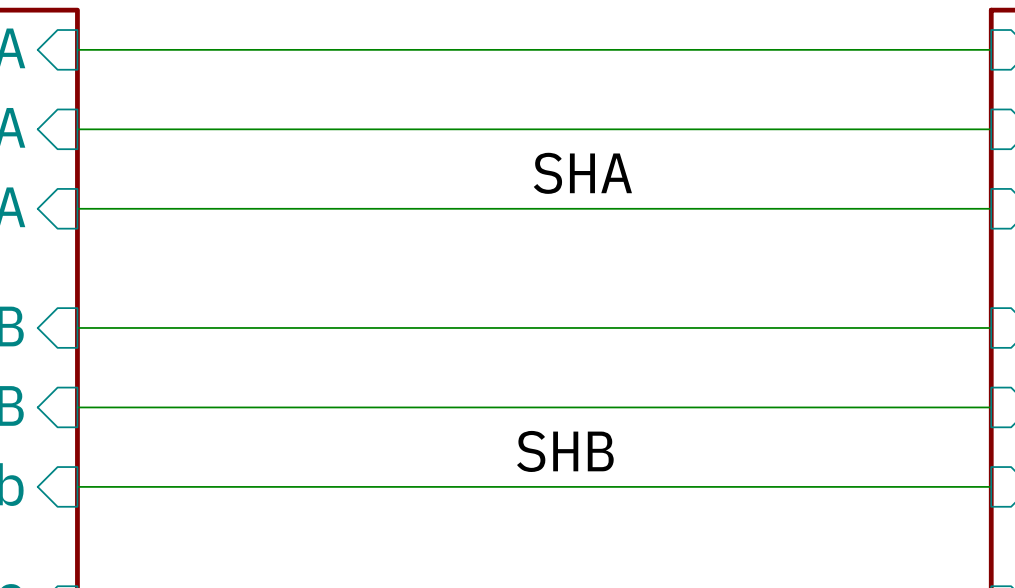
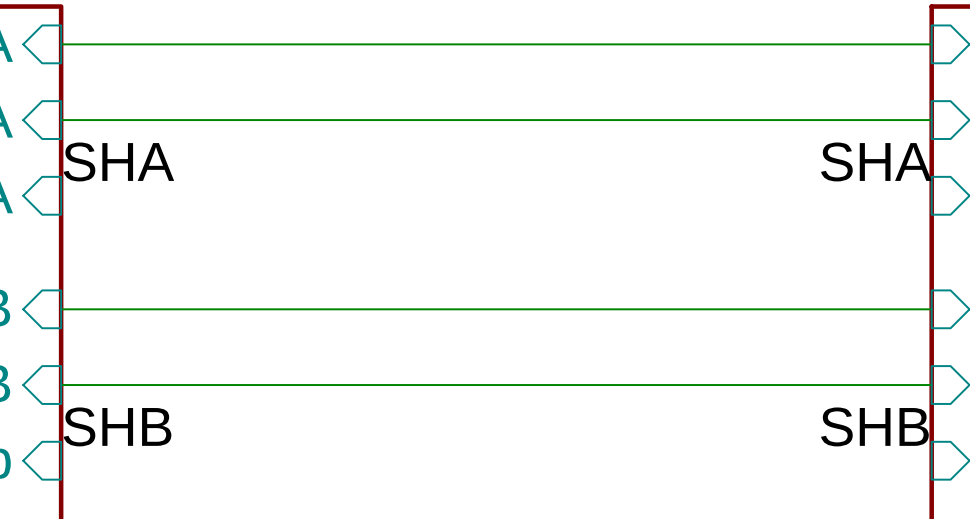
label: none -> SHA (118, 161)
label: SHA (582, 173) -> none
label: none -> SHA (876, 161)
wire: (77, 208) (991, 208) -> none
label: none -> SHB (117, 426)
label: SHB (565, 451) -> none
label: none -> SHB (874, 426)
wire: (77, 486) (991, 486) -> none

